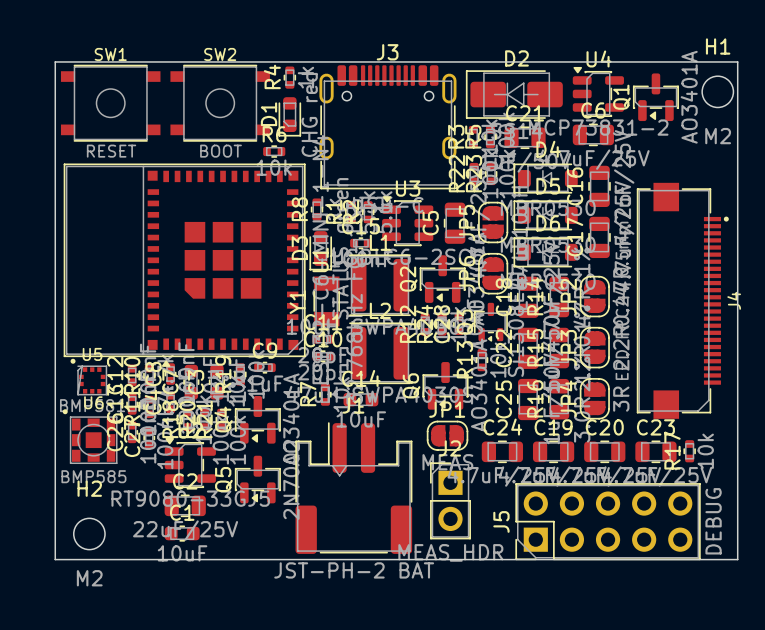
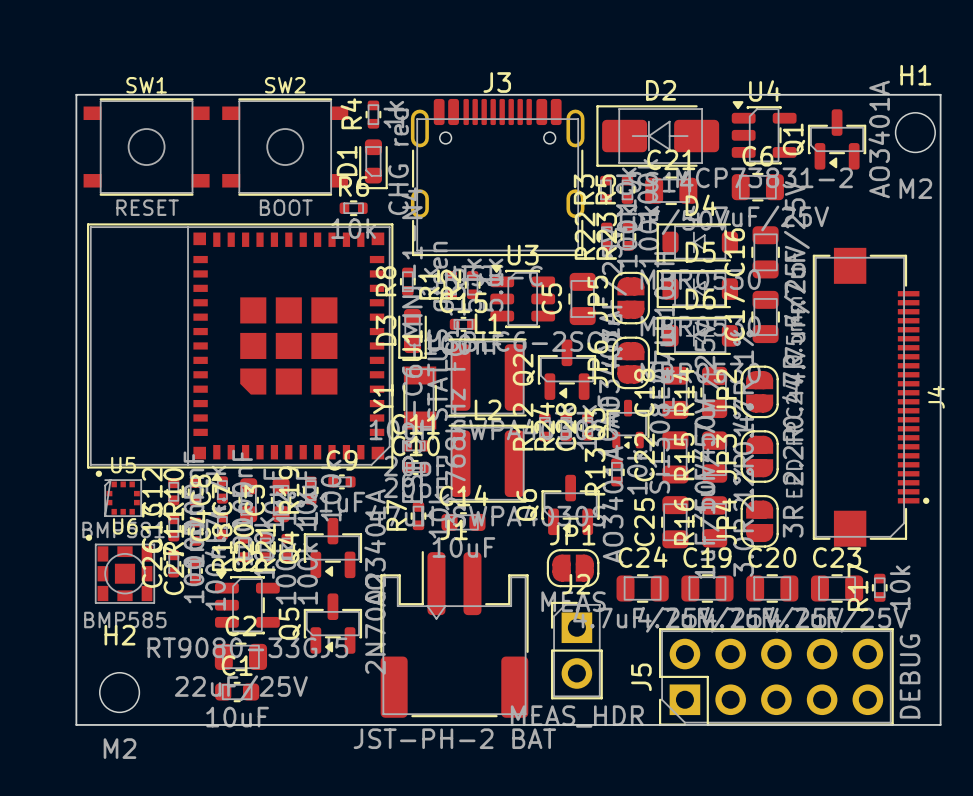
J4 footprint: [636, 182, 729, 419] -> [812, 247, 930, 547]

